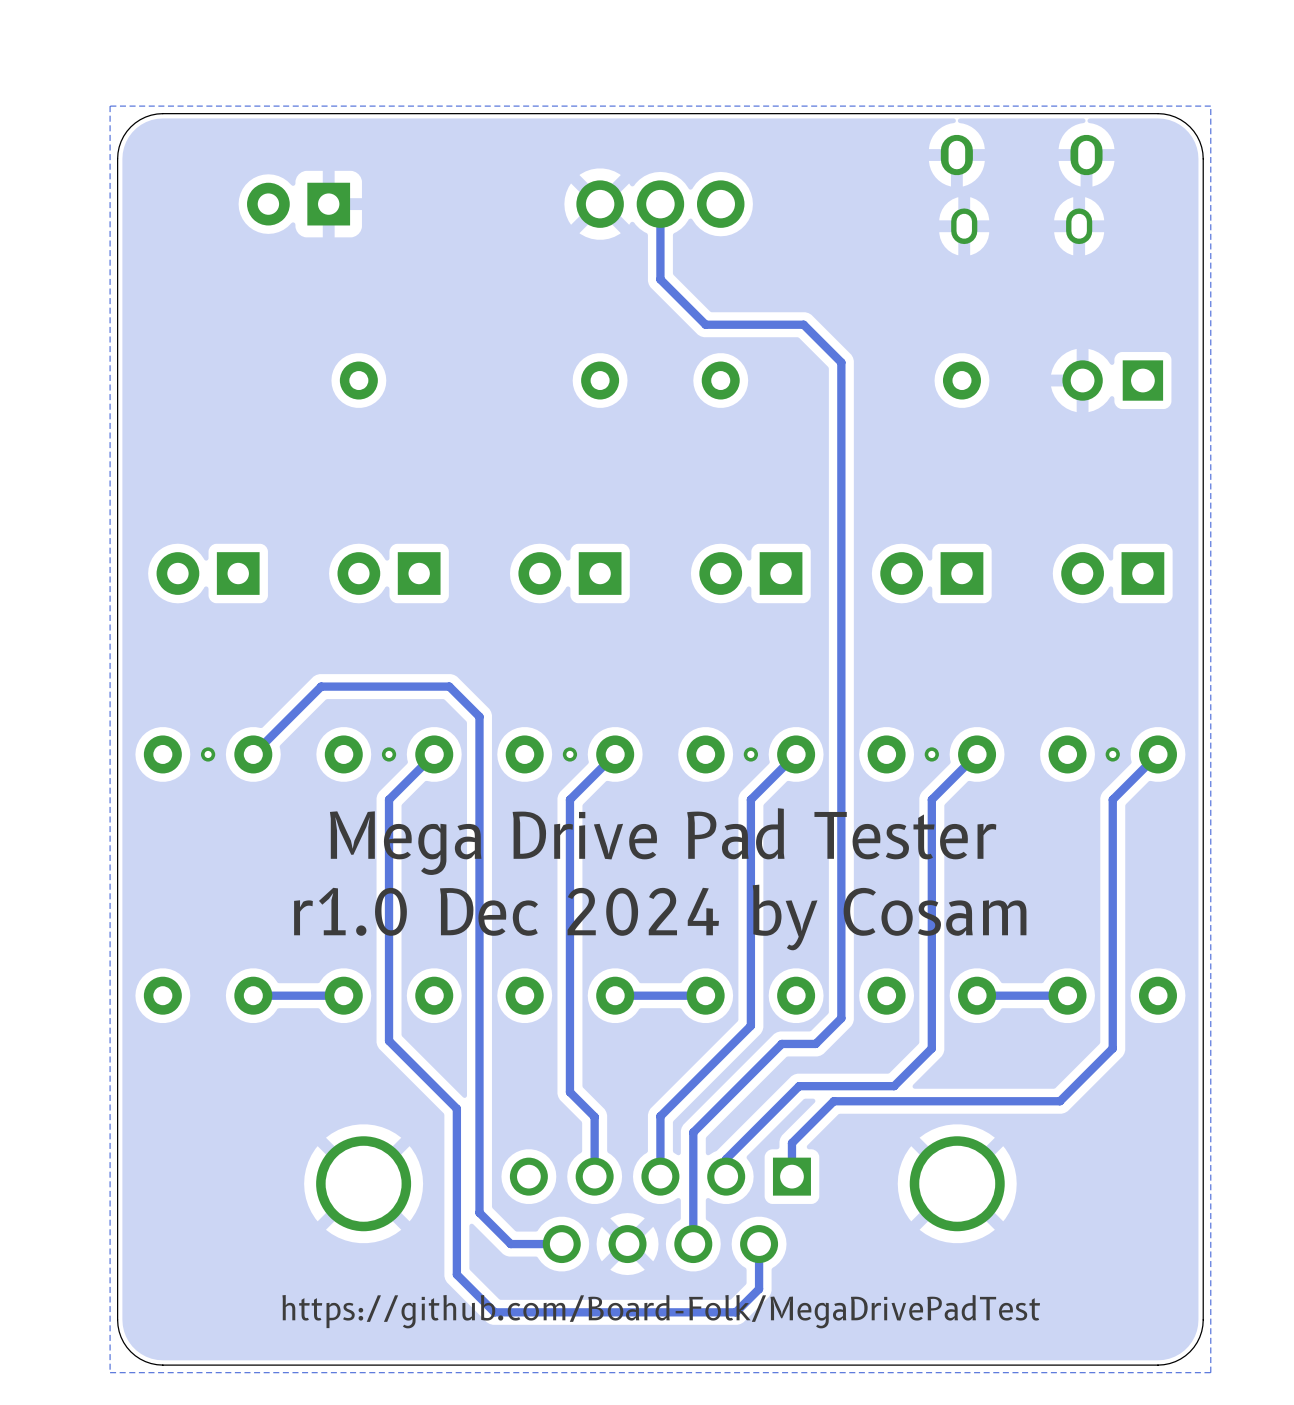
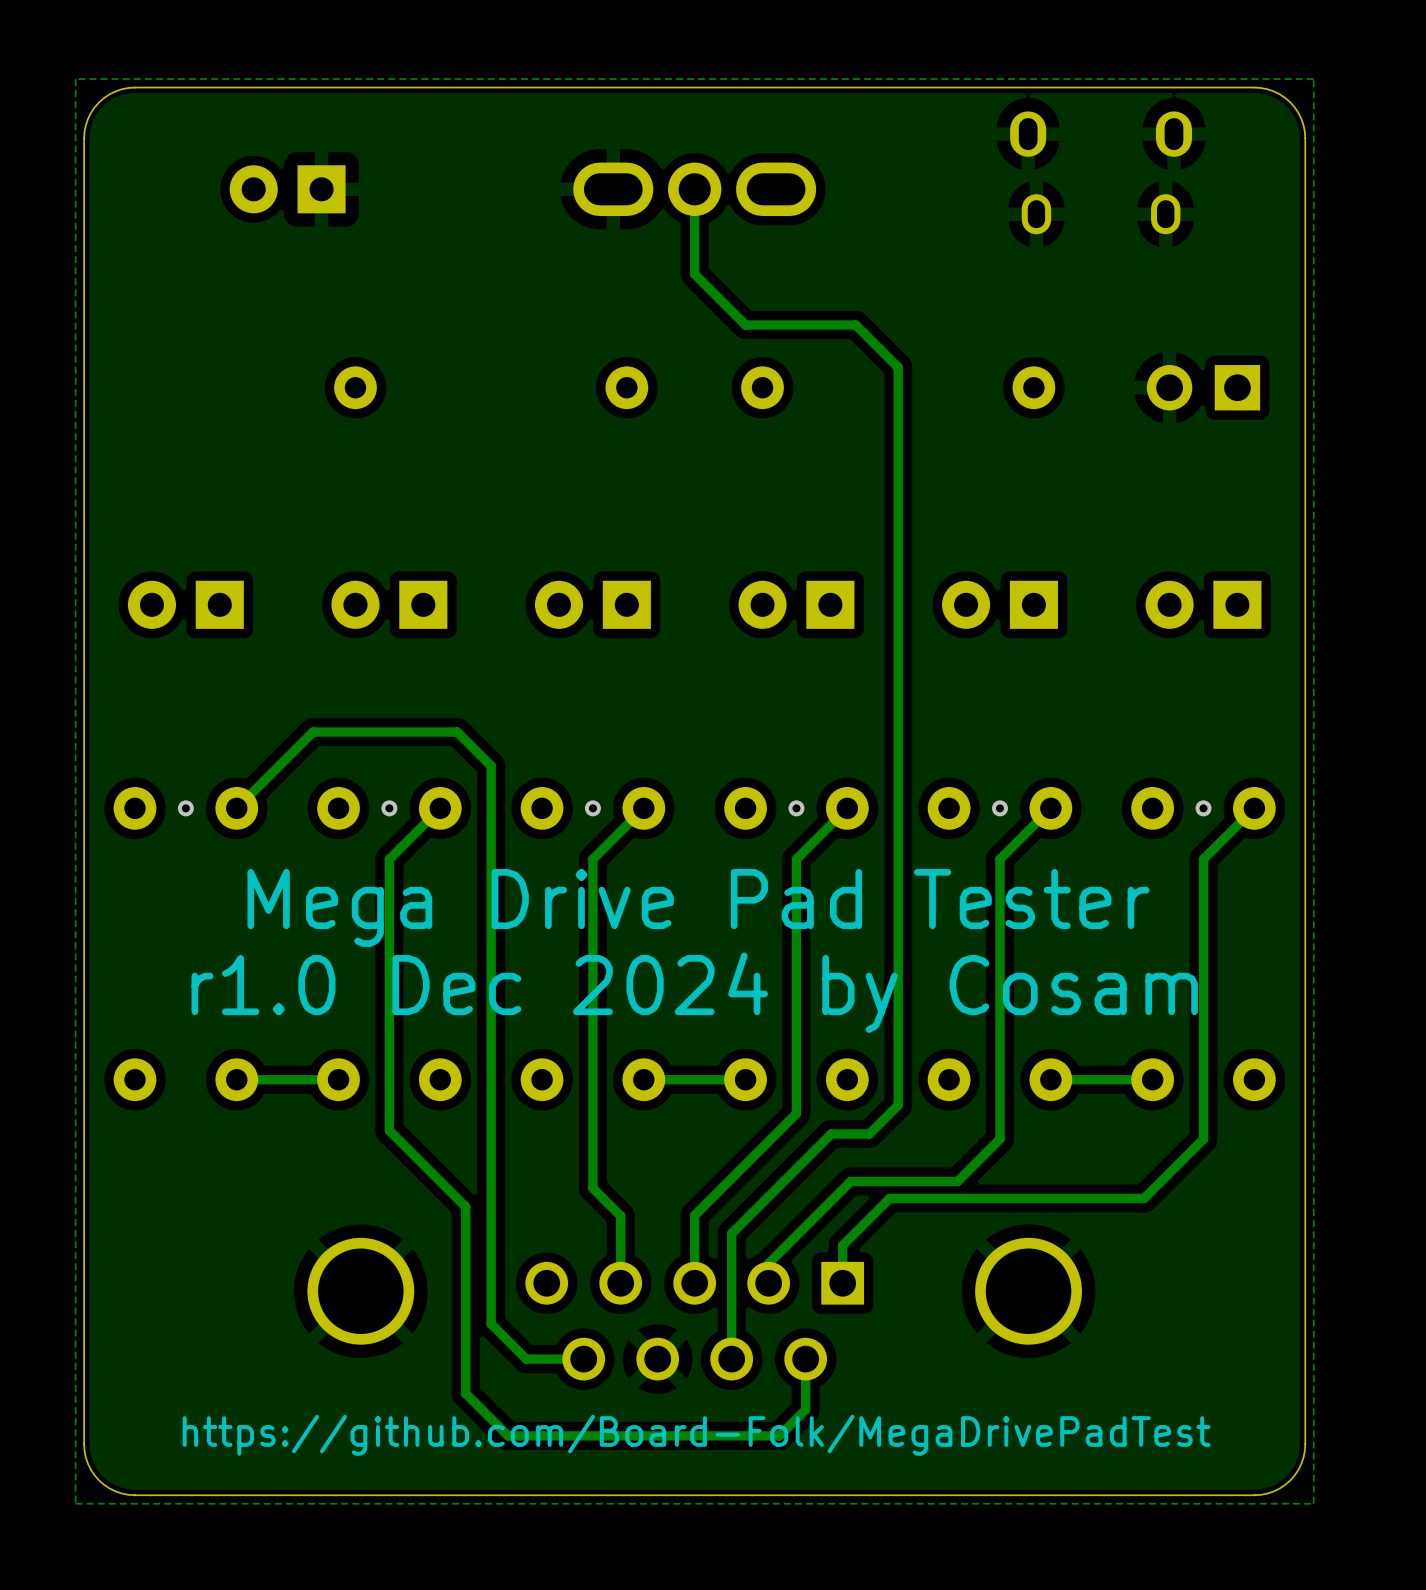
part footprint: [576, 180, 745, 228] -> [573, 162, 817, 217]

